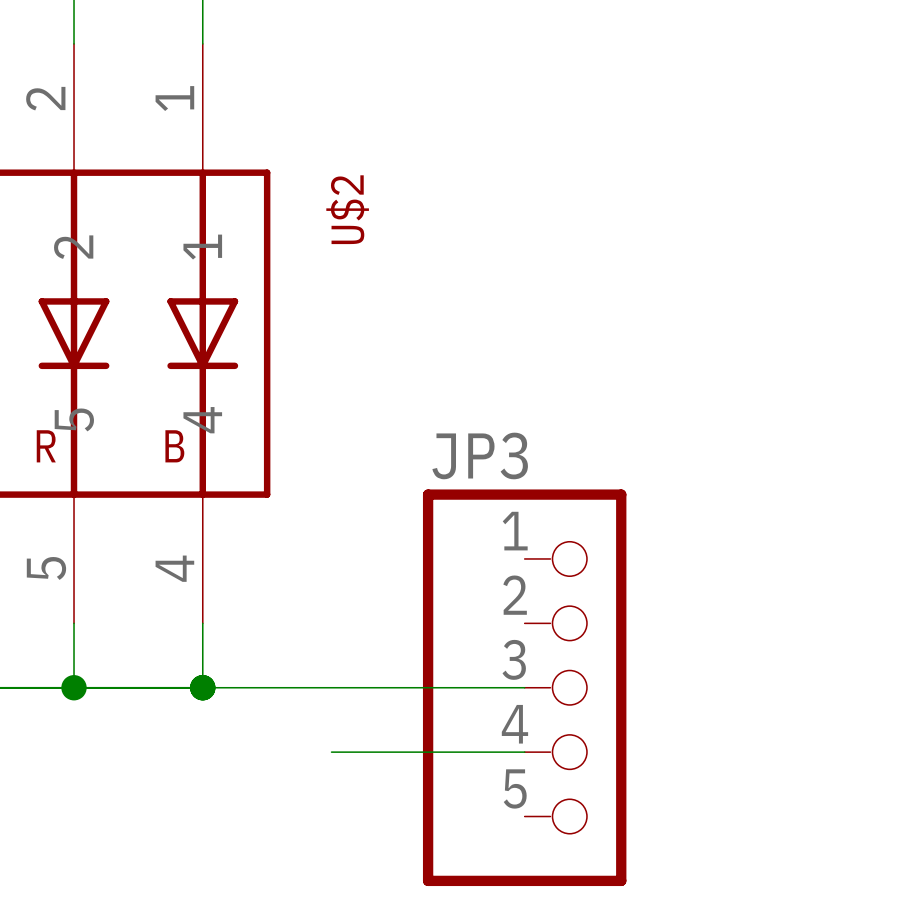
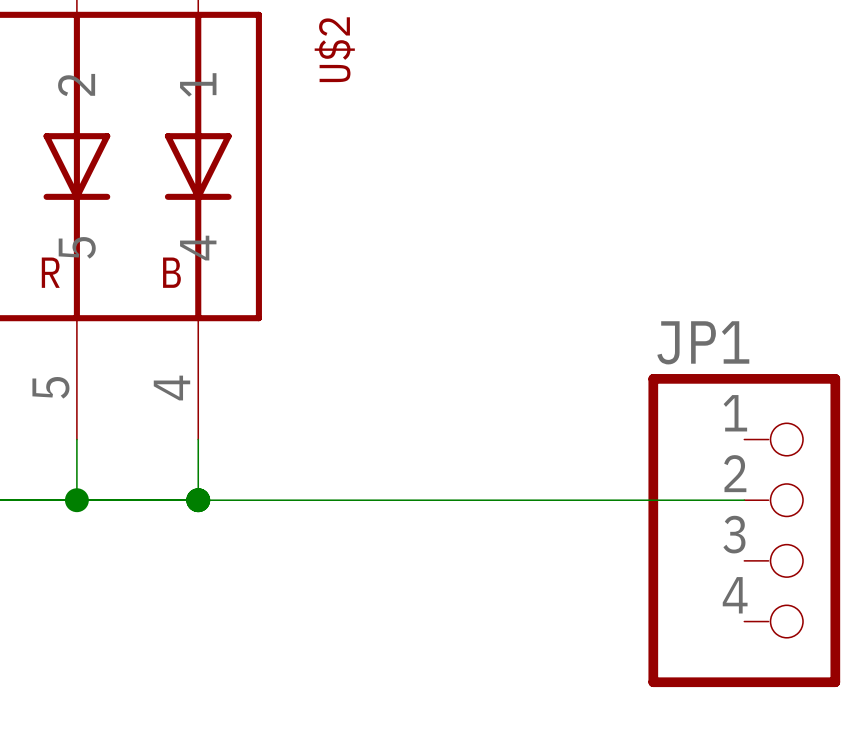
wire: none -> (501, 500) (744, 500)
JP3: (524, 687) -> none
JP1: none -> (744, 530)
wire: (331, 752) (524, 752) -> none

